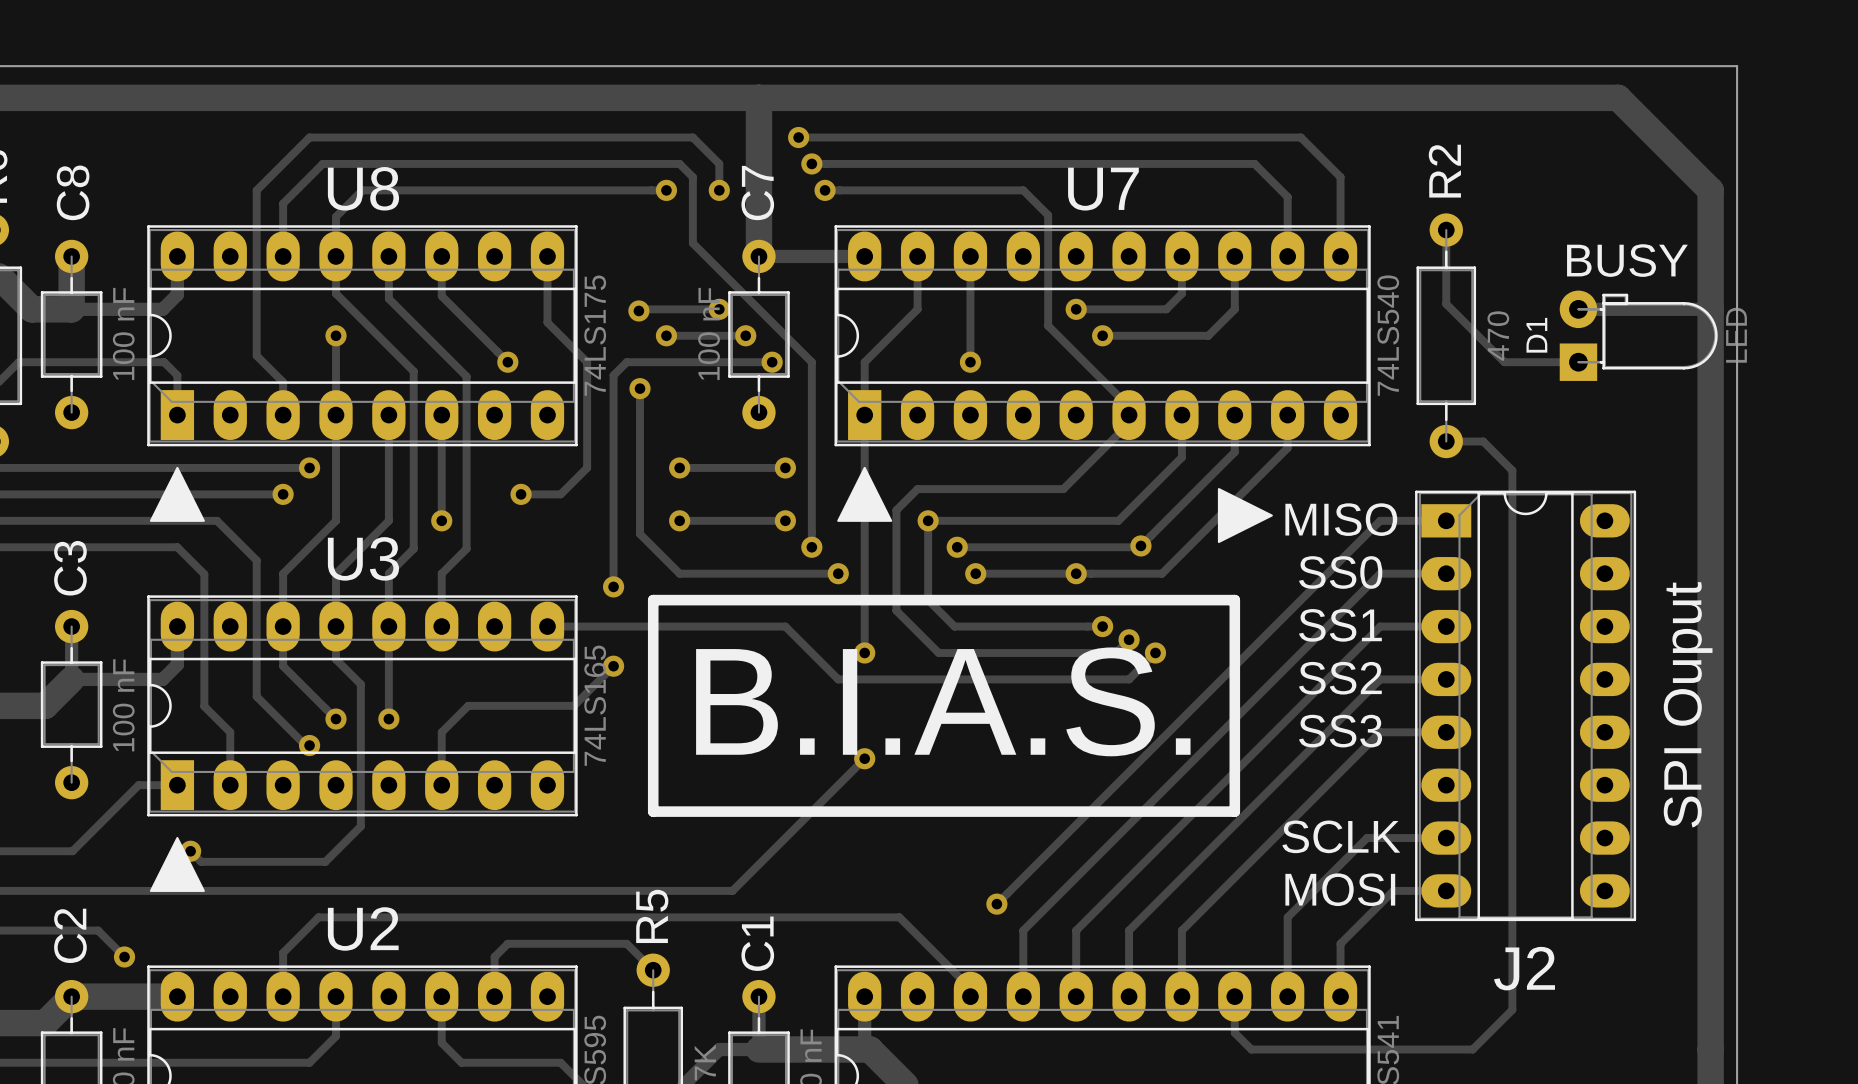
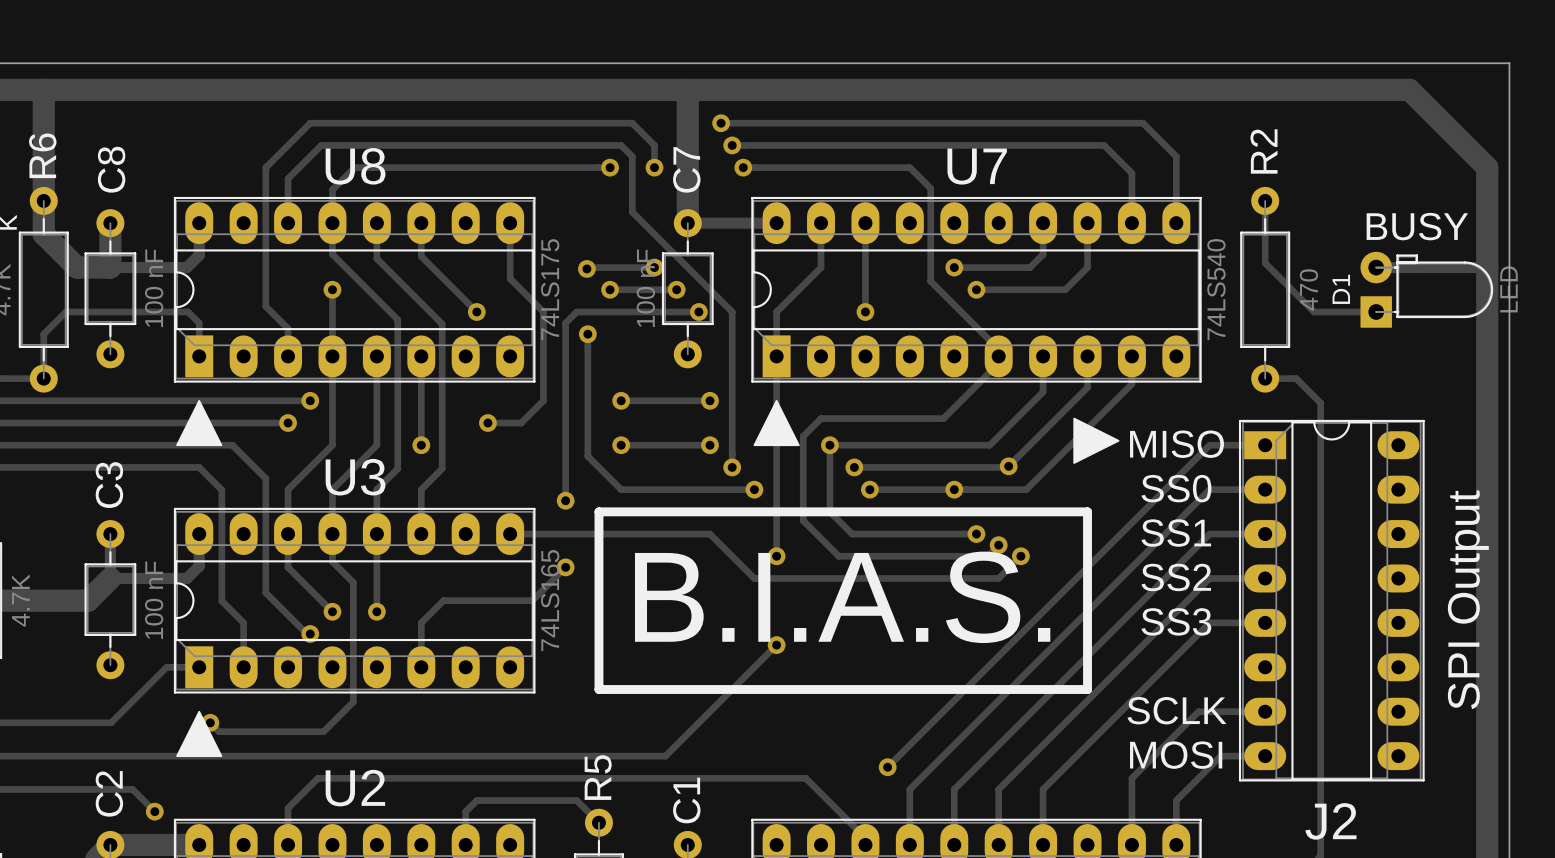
J2 value: SPI Ouput (1688, 704) -> SPI Output (1468, 599)

